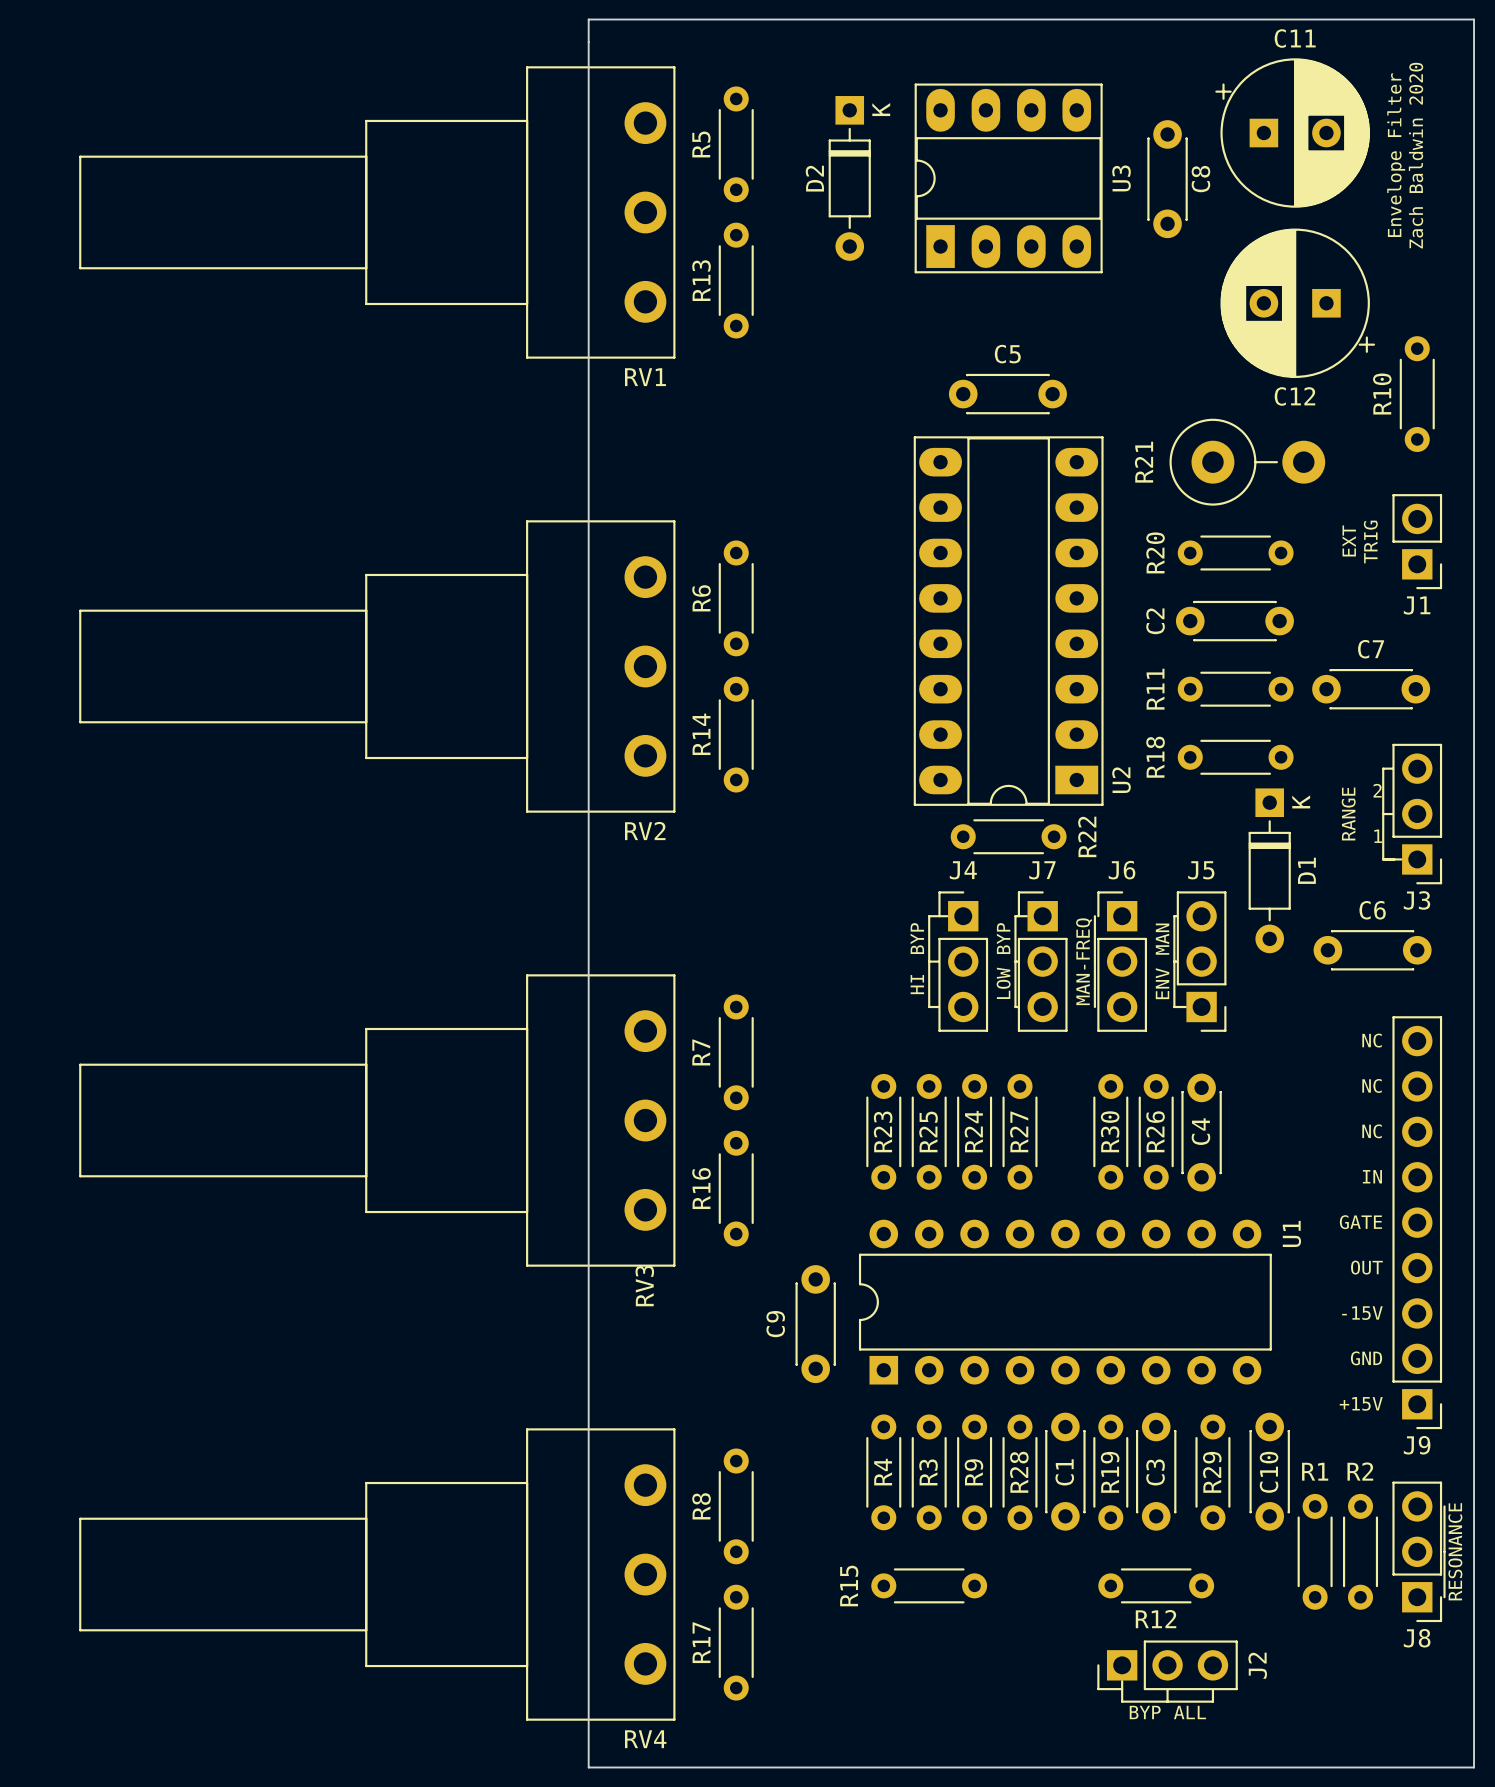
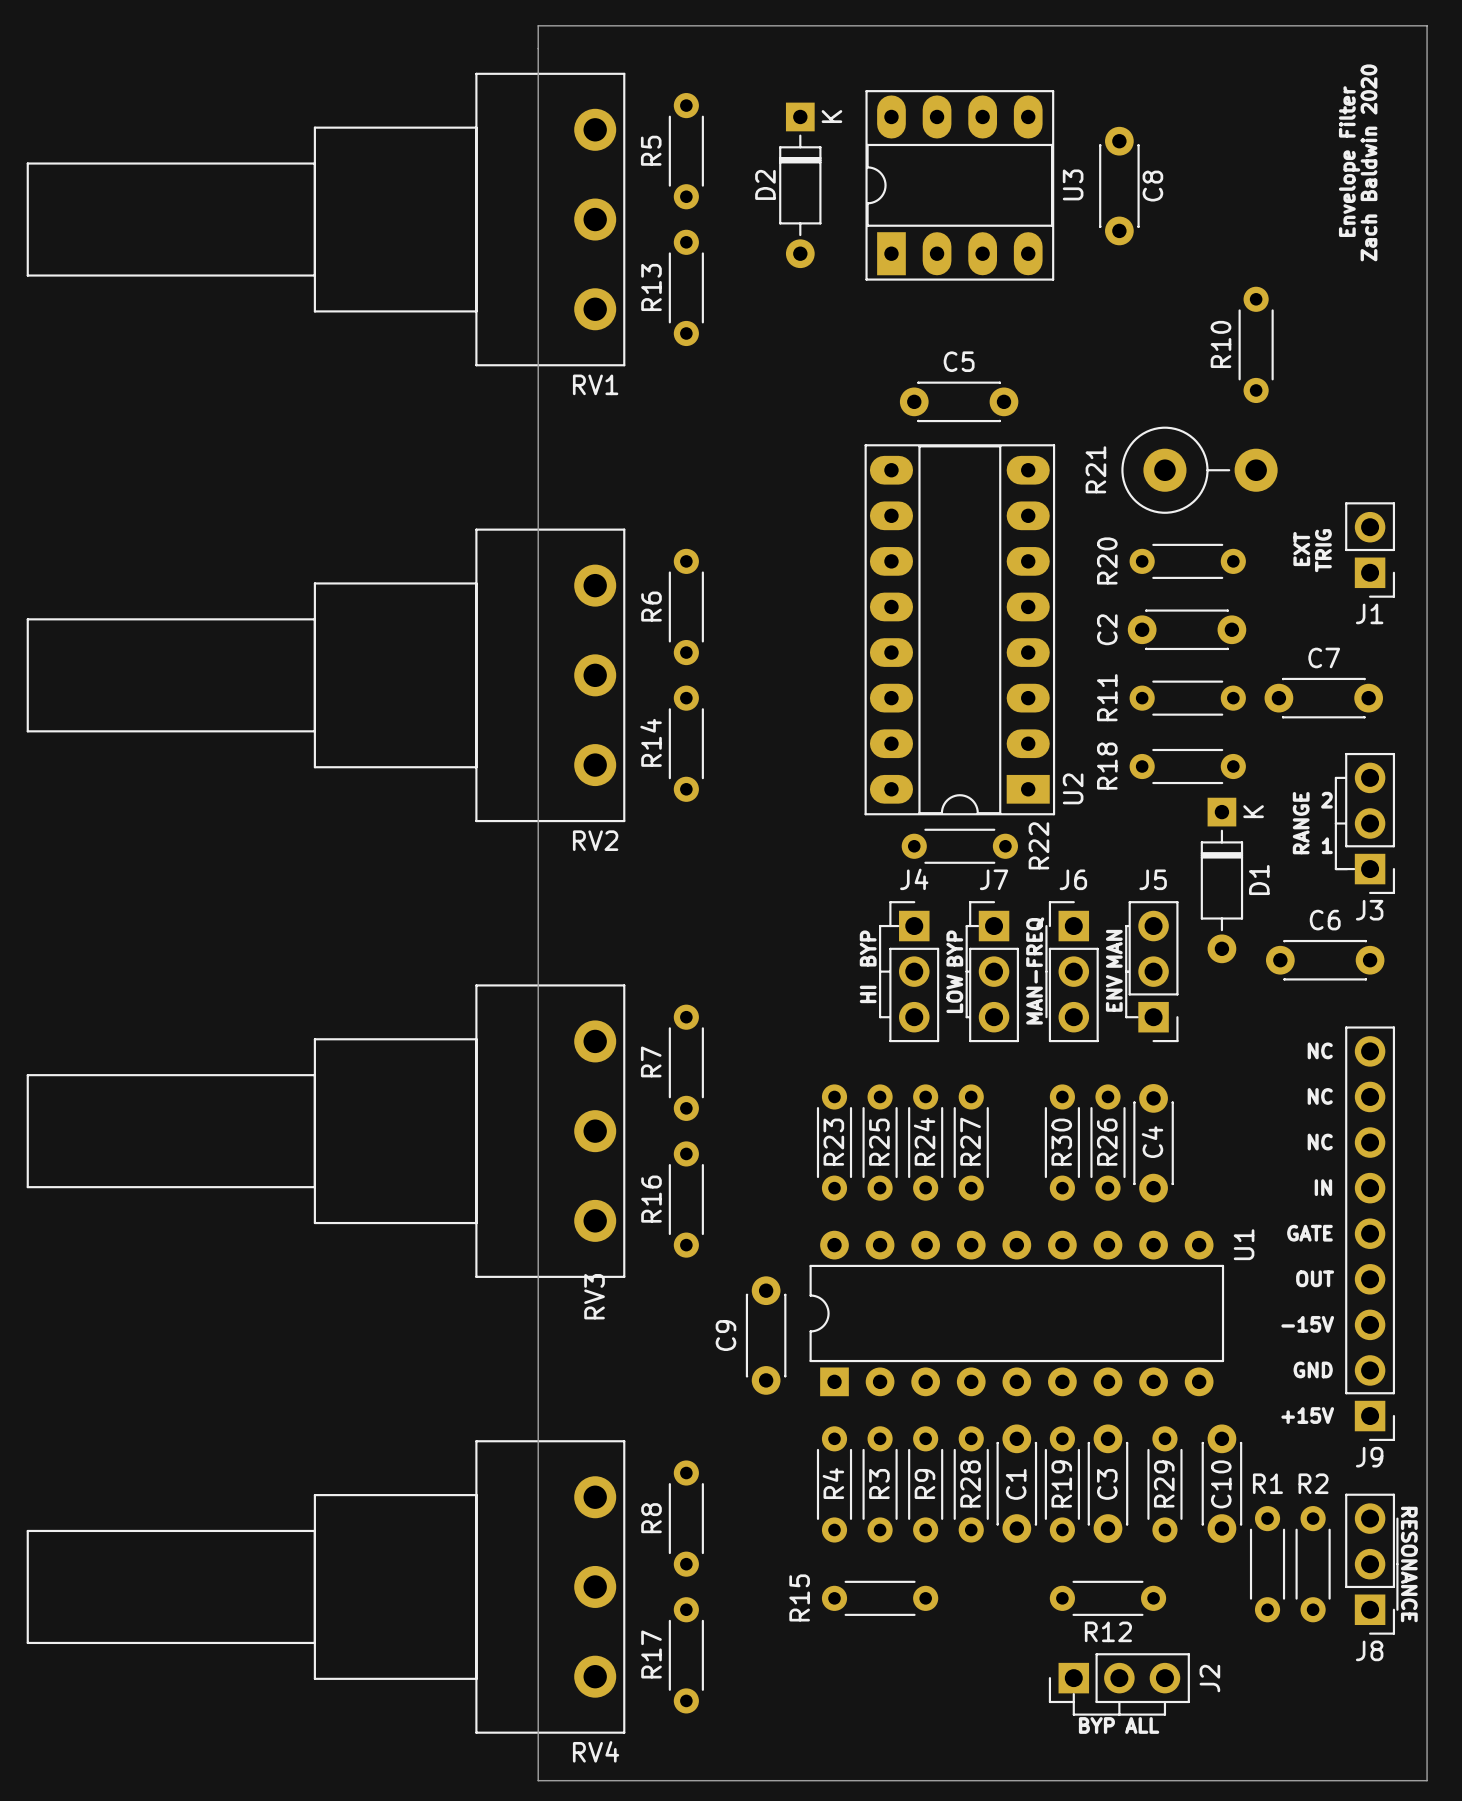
C11: (1292, 133) -> none
C12: (1297, 303) -> none
R10 position: (1417, 394) -> (1256, 344)
text rotation: 0° (1455, 1551) -> 180° (1409, 1564)

